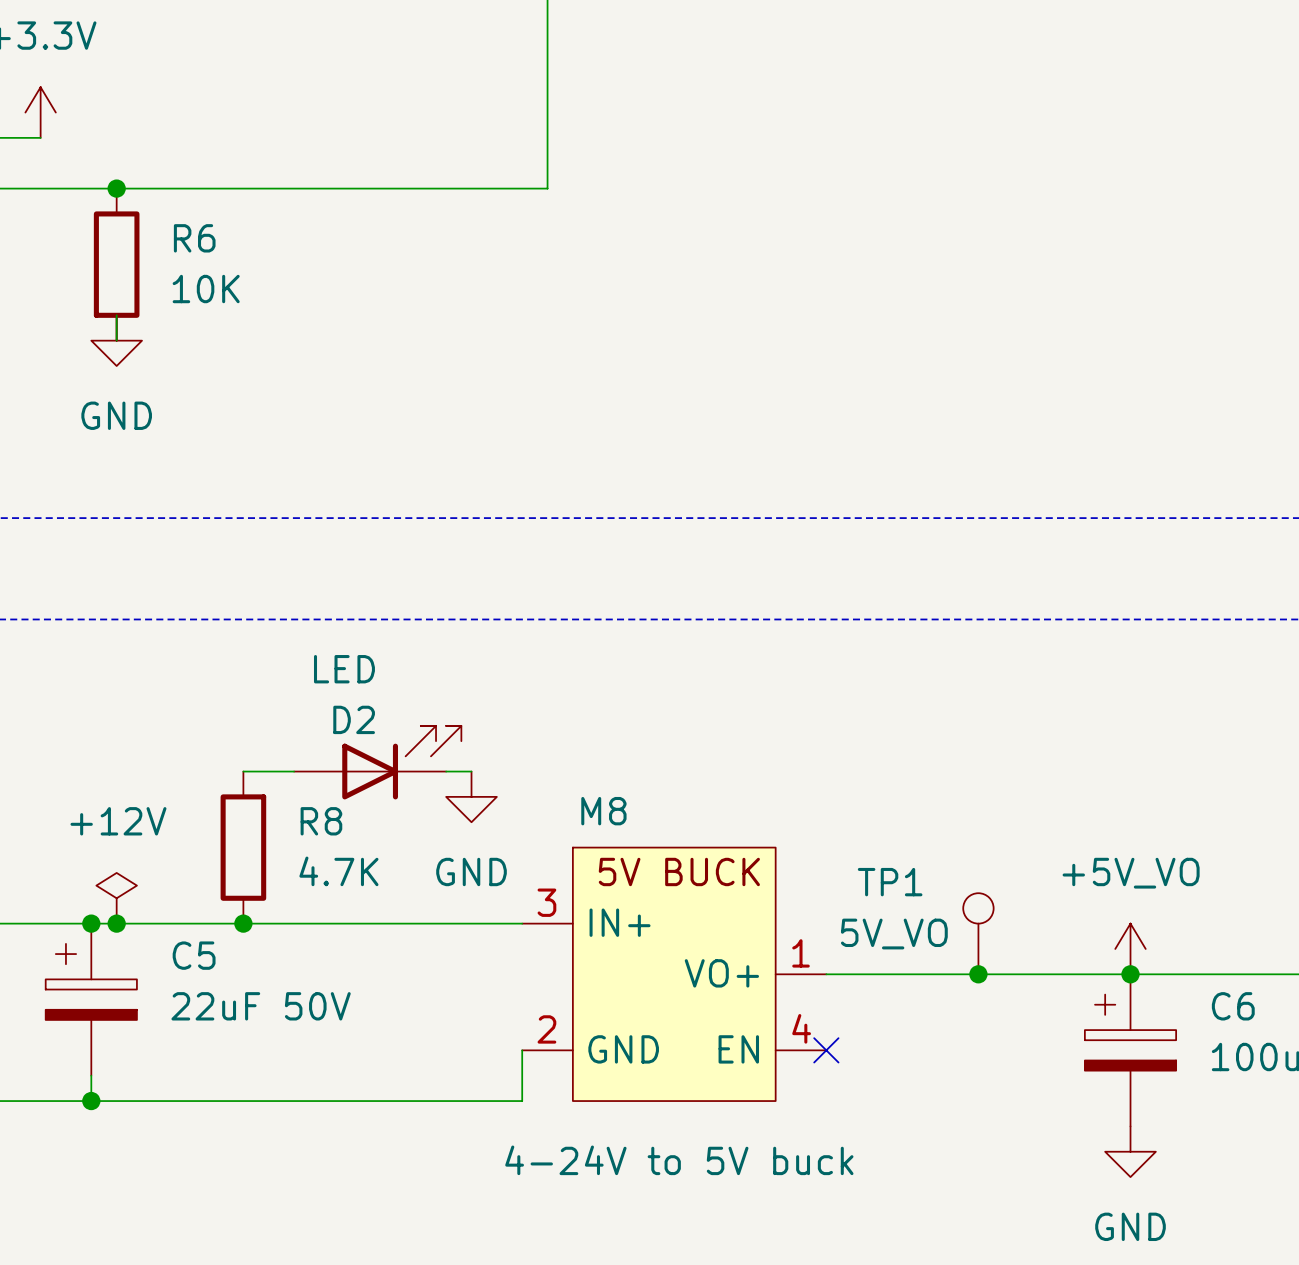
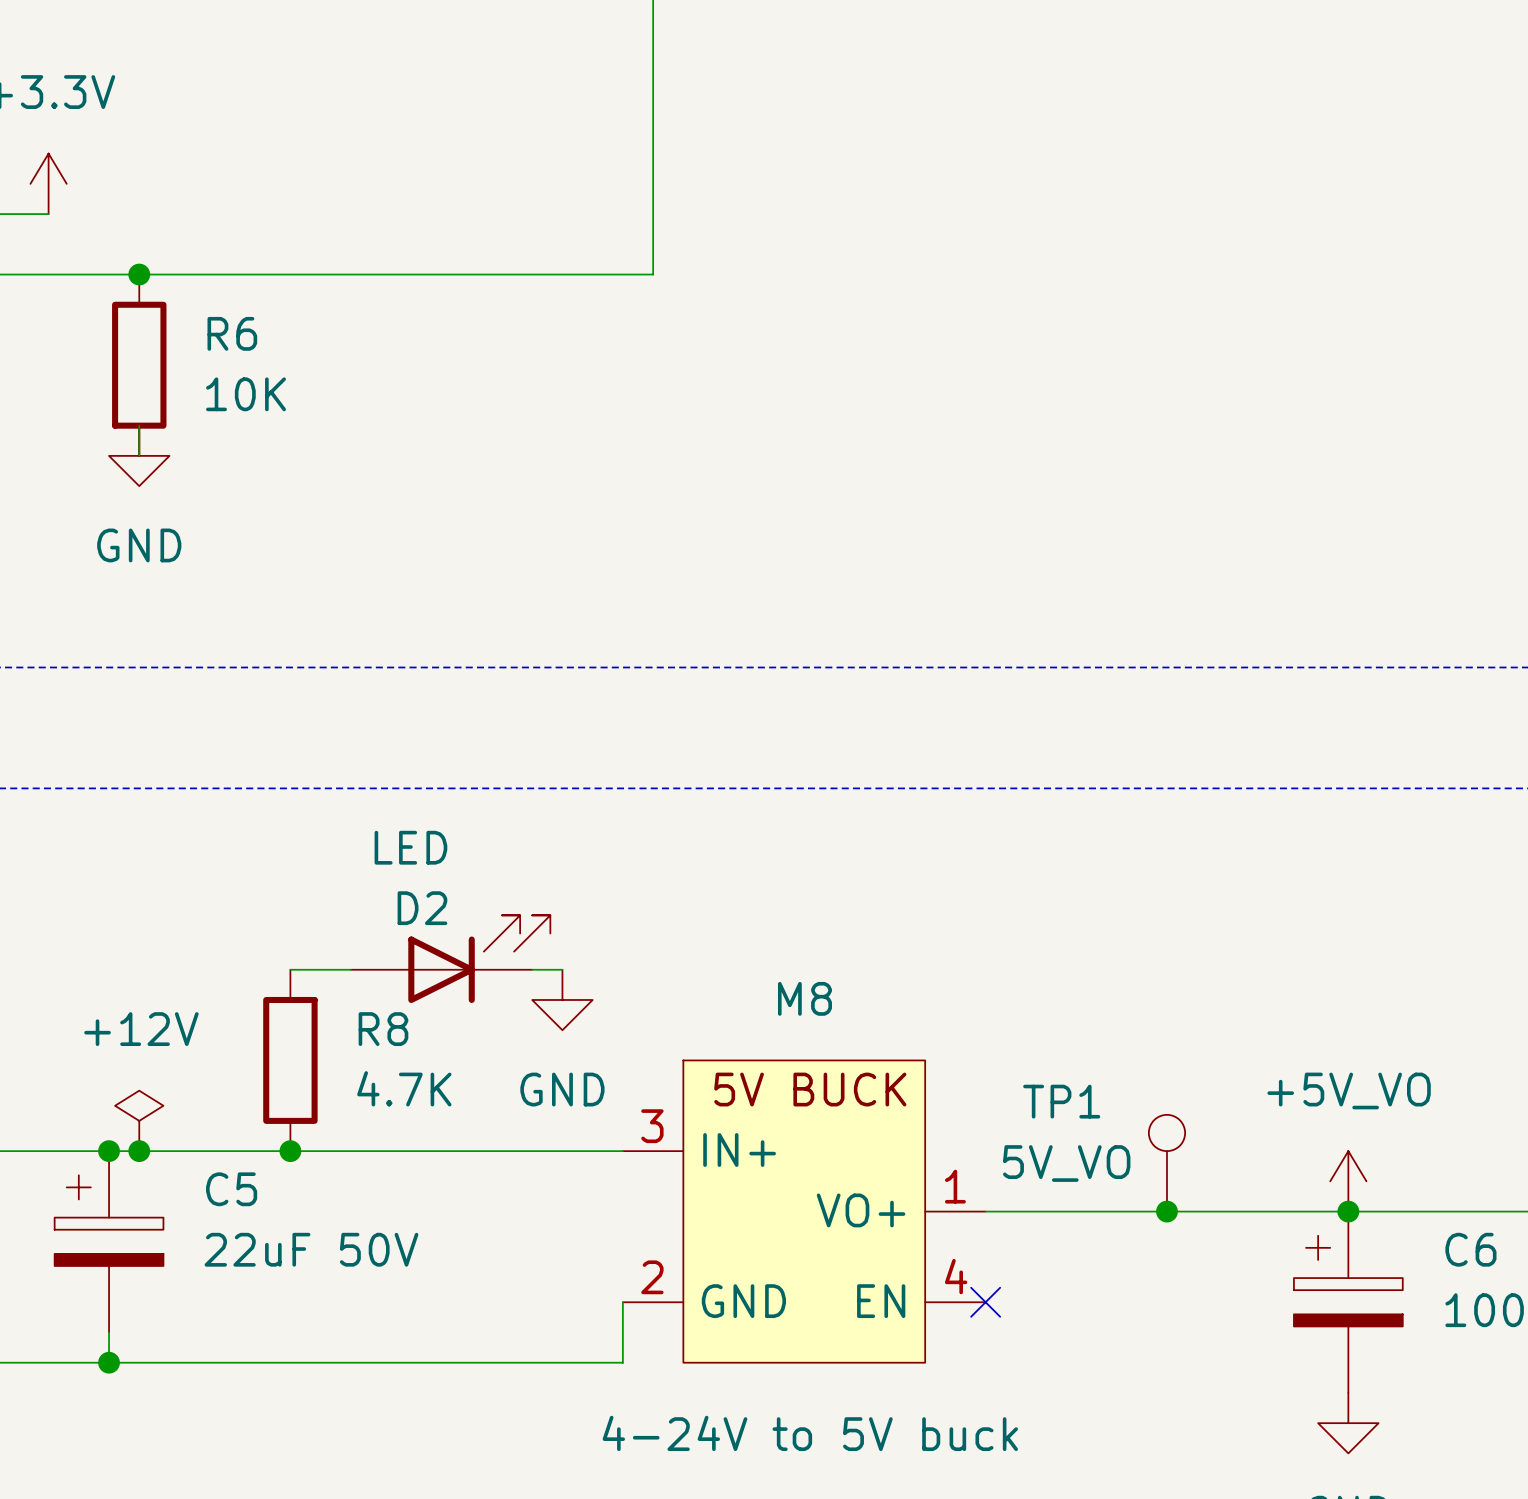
M8 name position: M8 (603, 811) -> M8 (804, 998)

